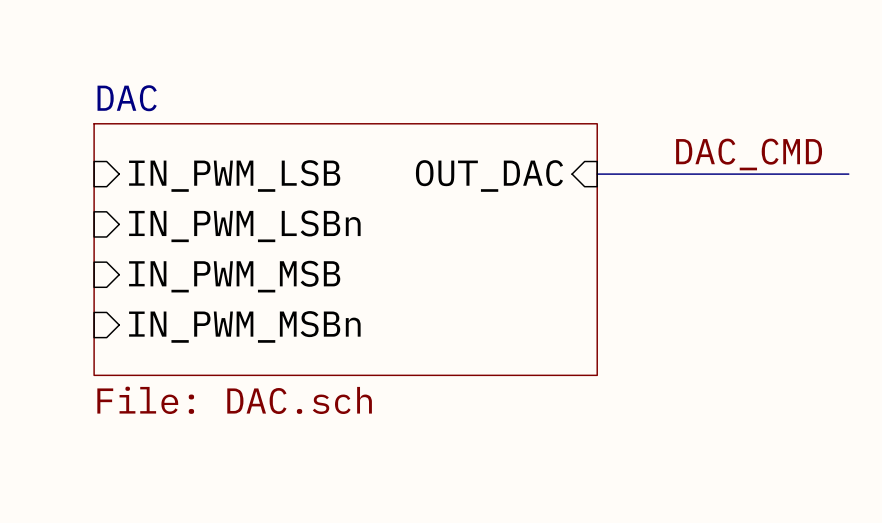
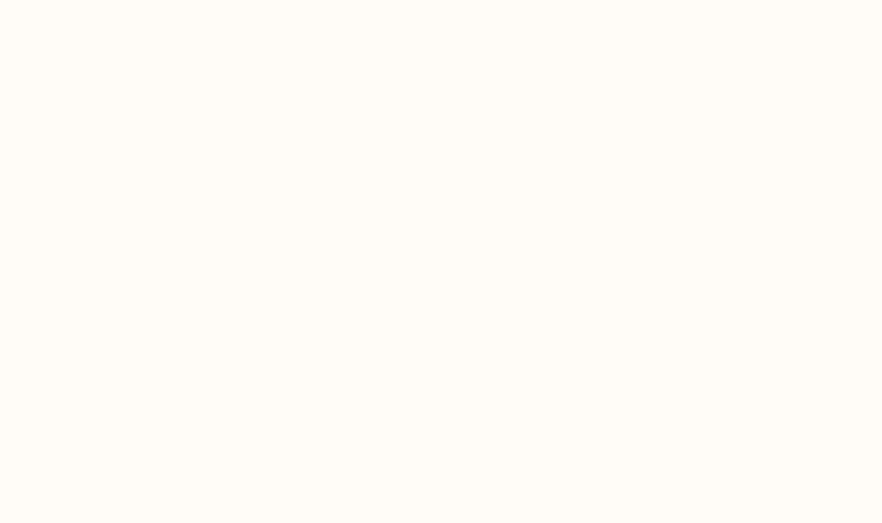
label: DAC_CMD (749, 154) -> none
wire: (597, 174) (848, 174) -> none
sheet pin: IN_PWM_LSB (234, 175) -> none
sheet pin: OUT_DAC (489, 175) -> none
sheet pin: IN_PWM_LSBn (244, 226) -> none
sheet DAC: File: DAC.sch (345, 249) -> none
sheet pin: IN_PWM_MSB (234, 276) -> none
sheet pin: IN_PWM_MSBn (244, 326) -> none

